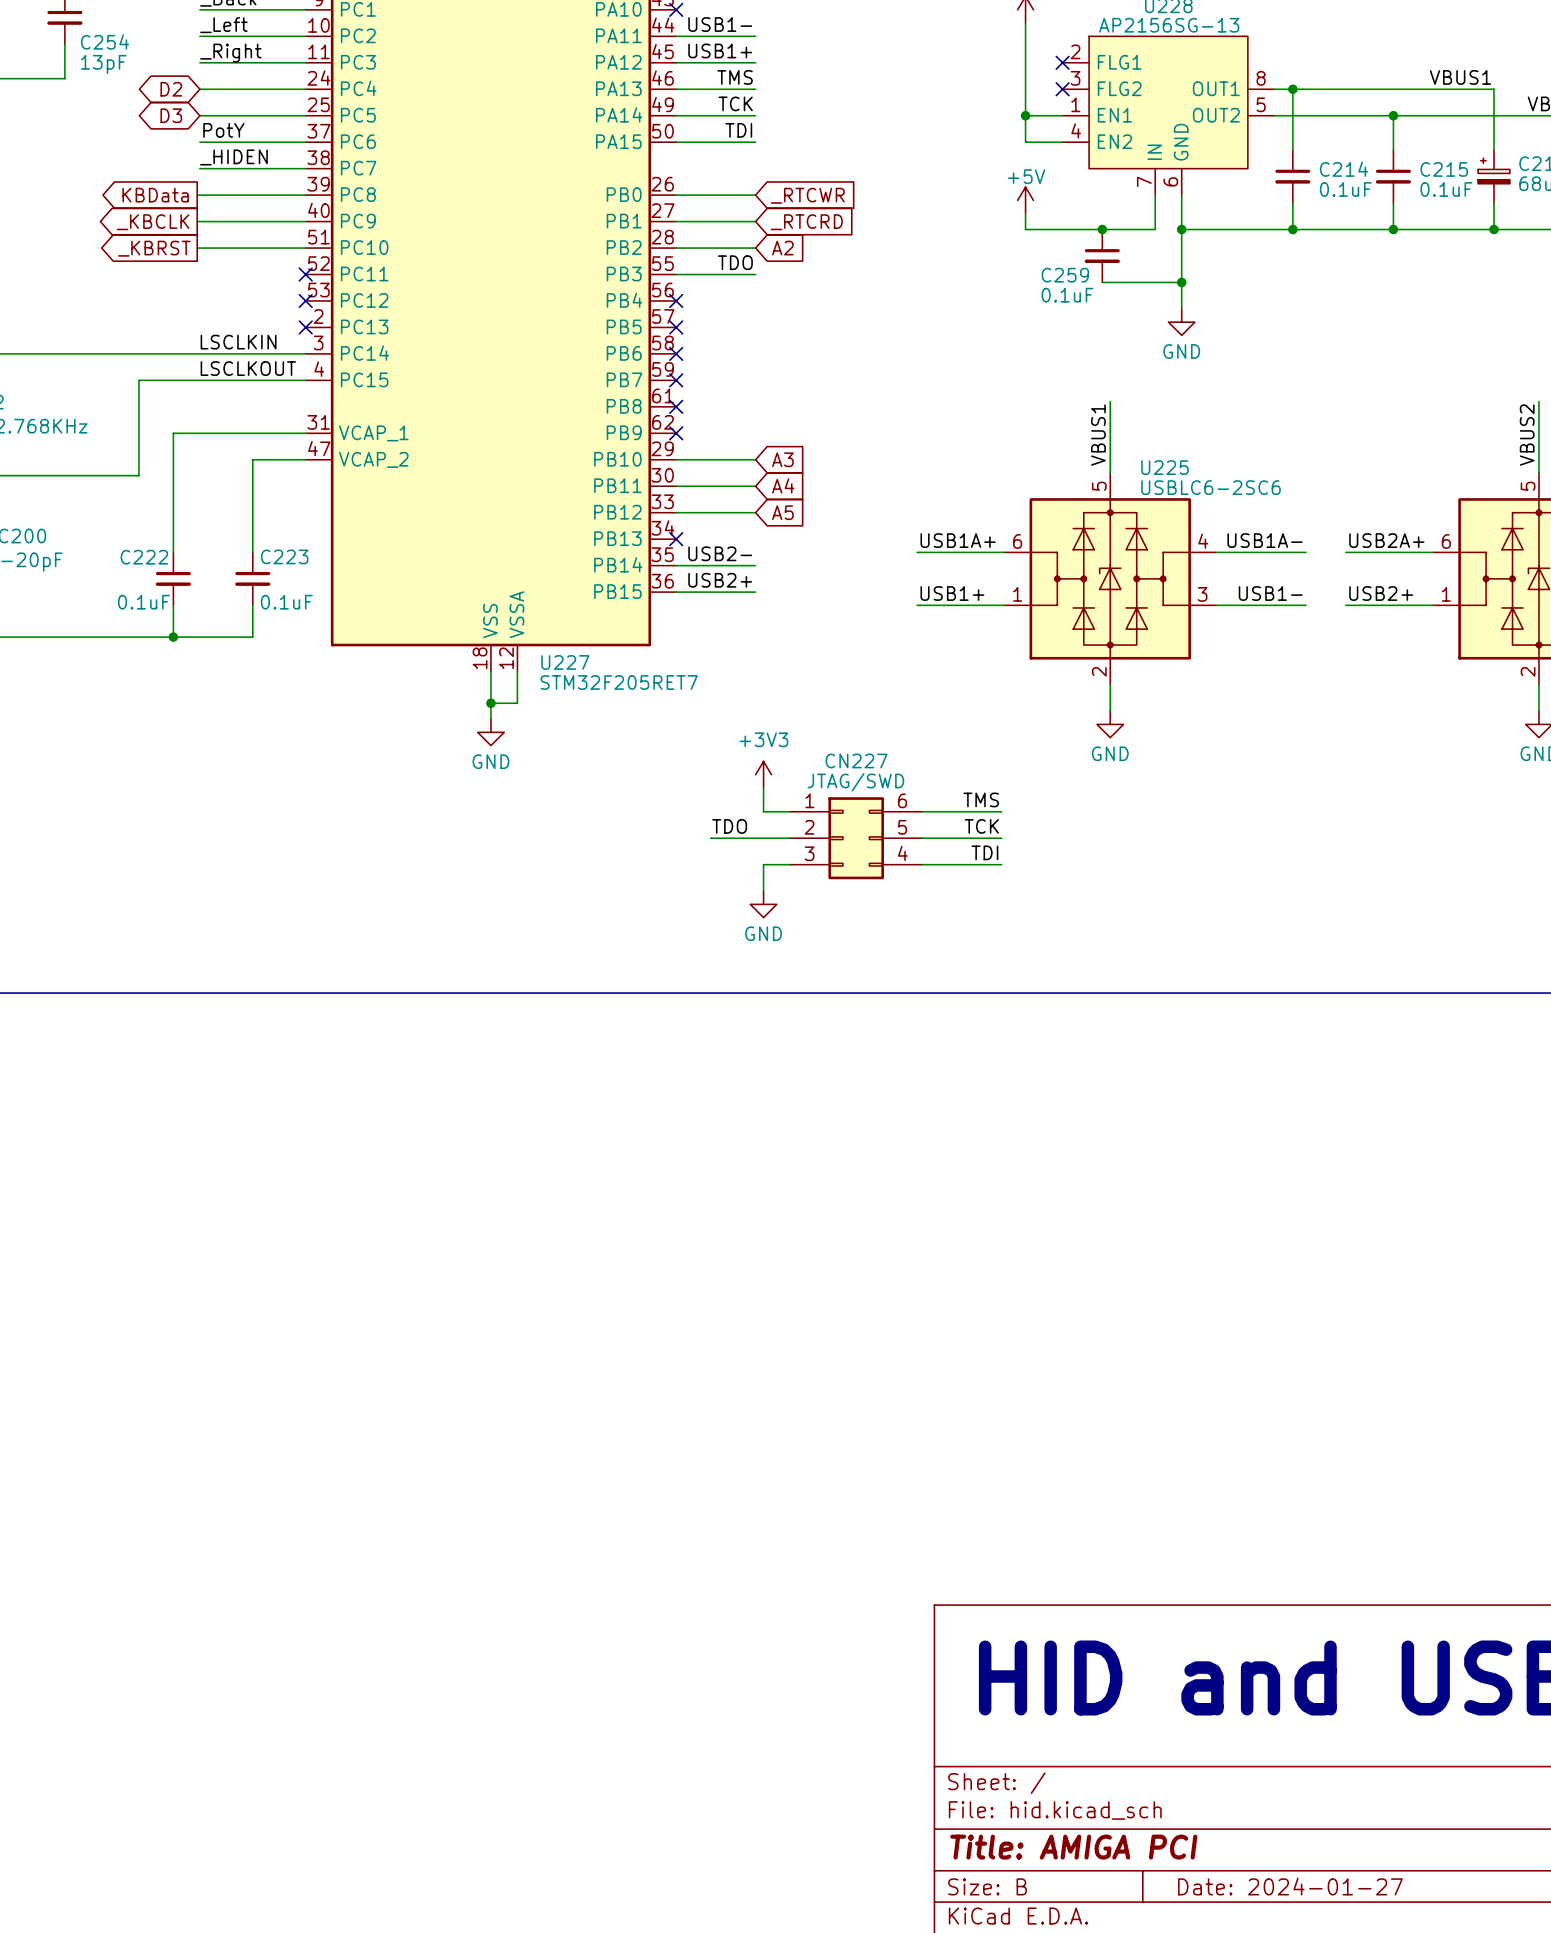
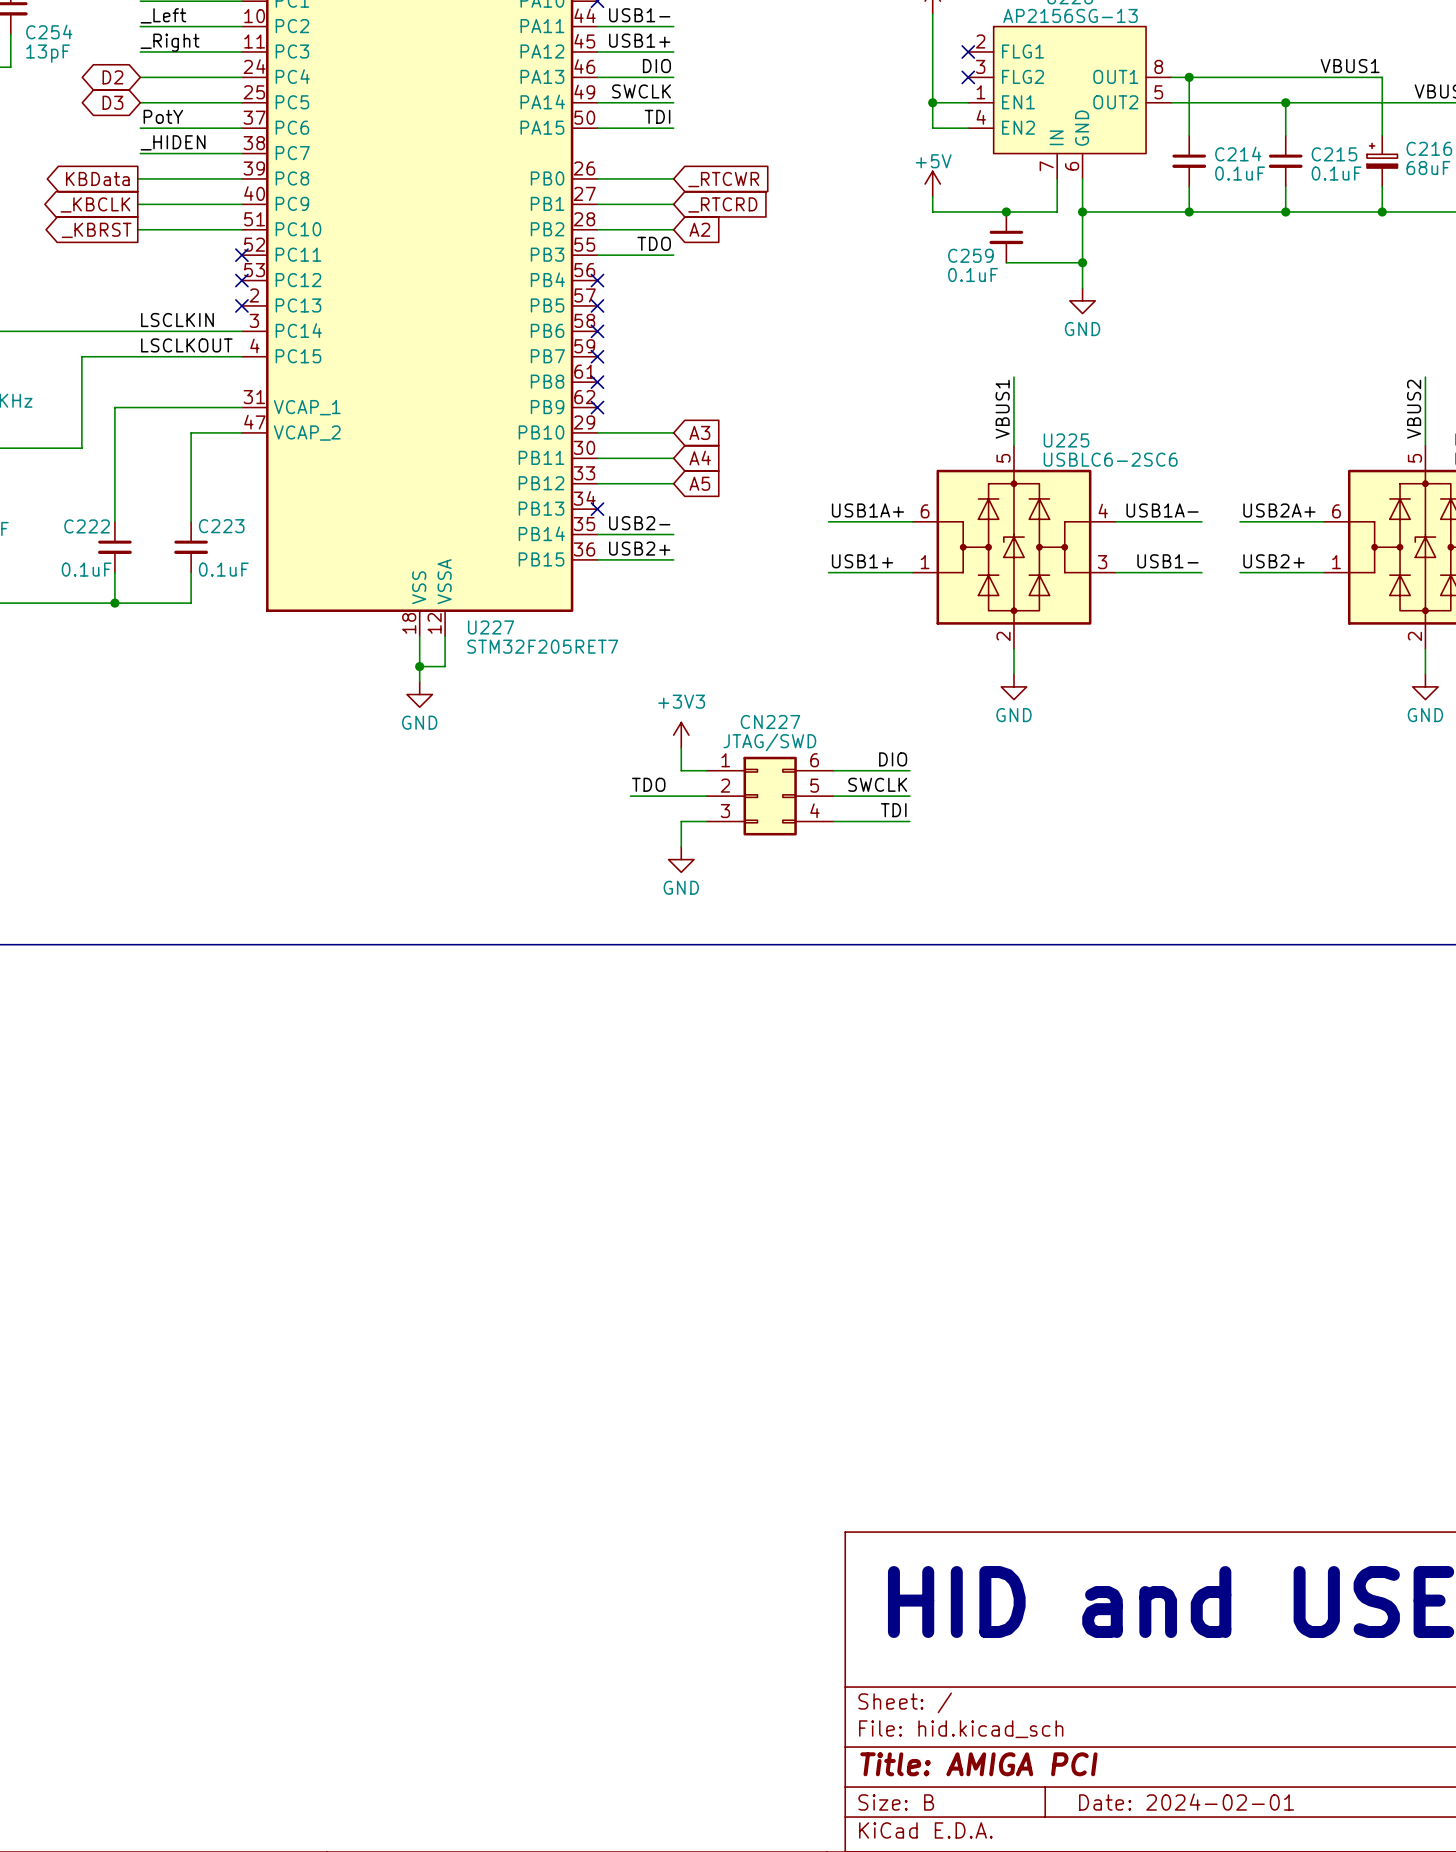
label: TMS (735, 77) -> DIO (656, 66)
label: TCK (735, 103) -> SWCLK (641, 91)
label: TMS (981, 799) -> DIO (893, 759)
label: TCK (981, 826) -> SWCLK (877, 784)
title block: Date: 2024-01-27 (1290, 1886) -> Date: 2024-02-01 (1186, 1802)

